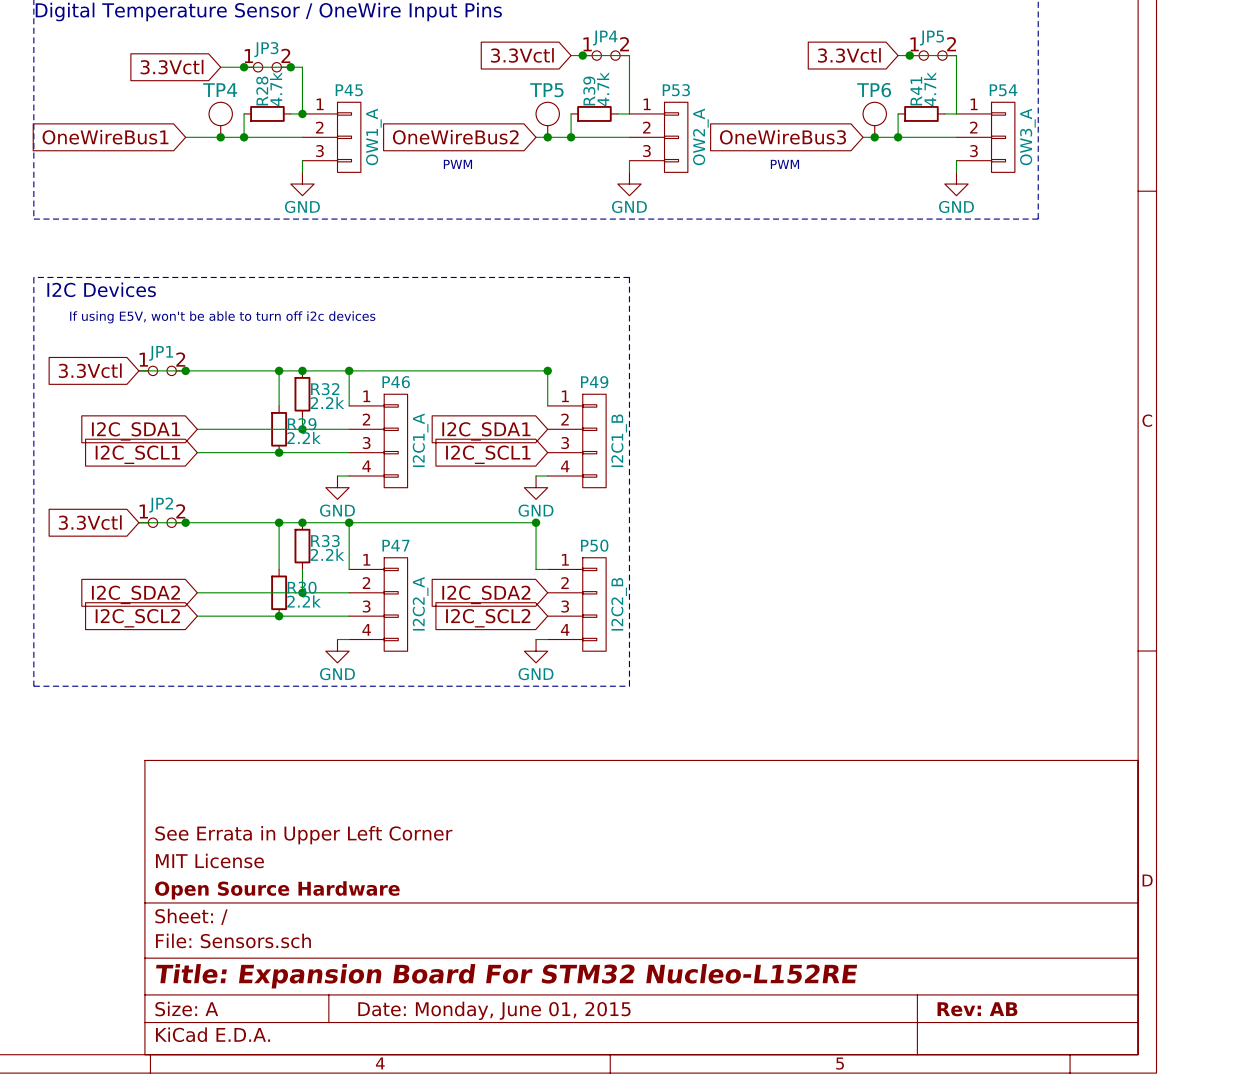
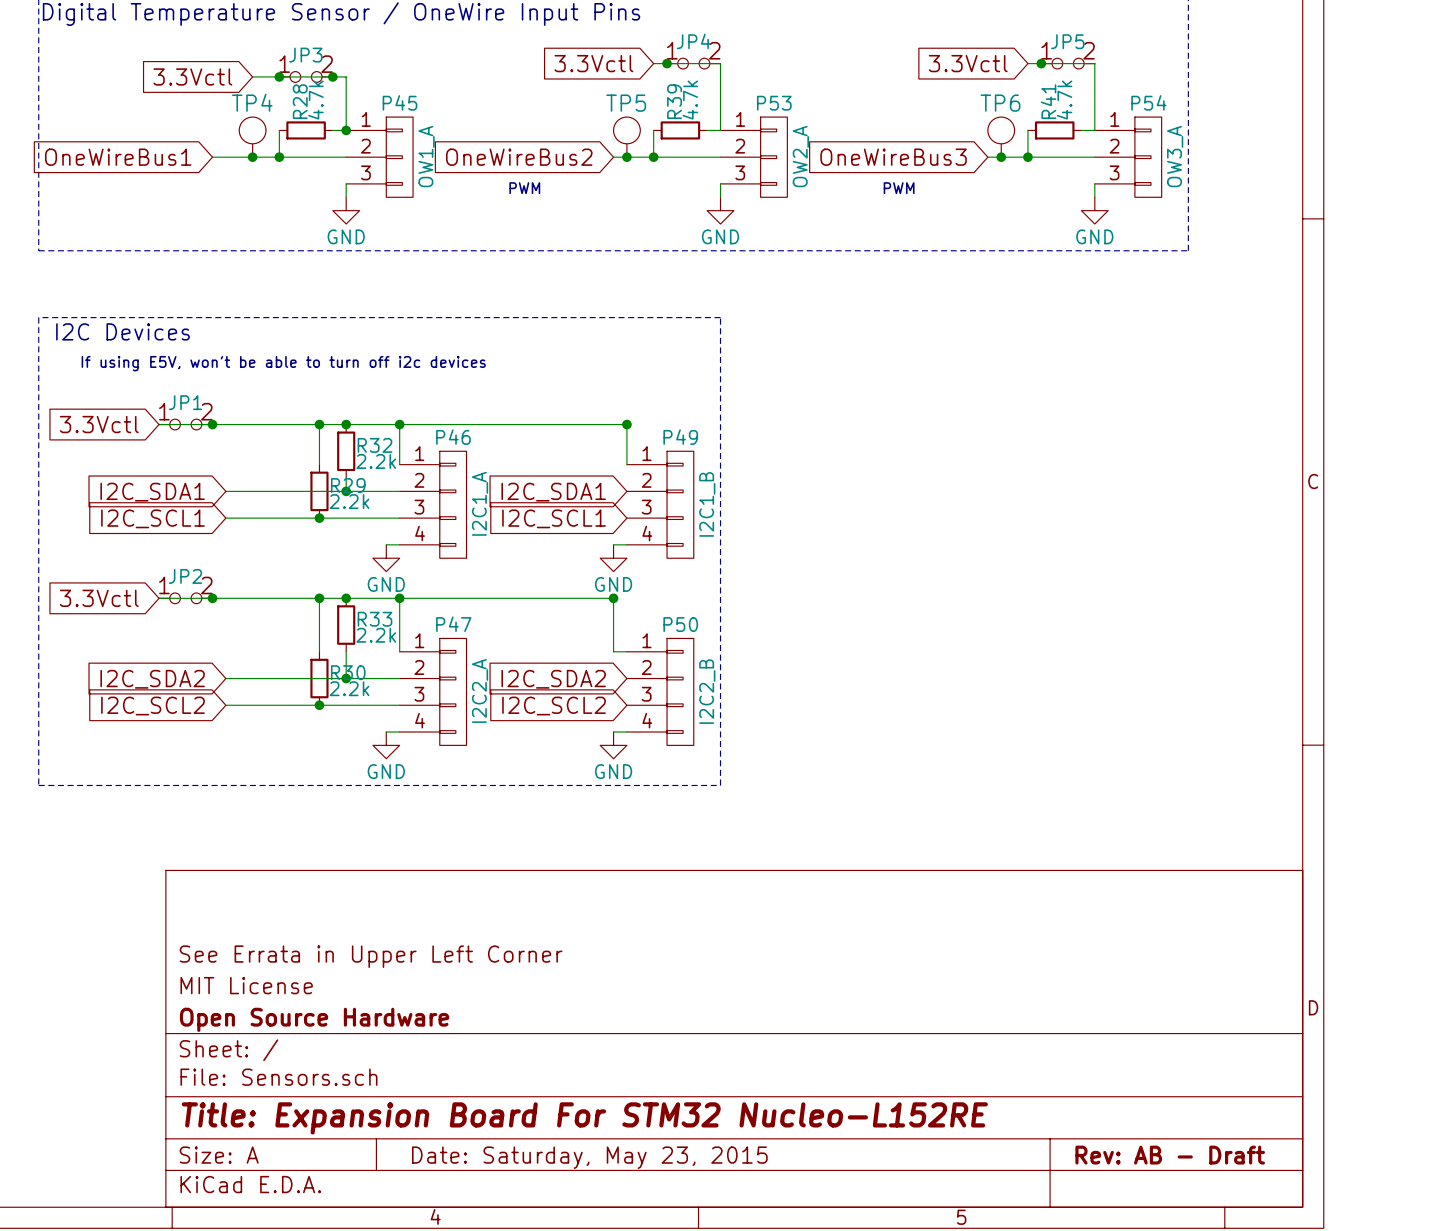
title block: Rev: AB (977, 1009) -> Rev: AB - Draft (1170, 1155)
title block: Date: Monday, June 01, 2015 (494, 1010) -> Date: Saturday, May 23, 2015 (589, 1157)

